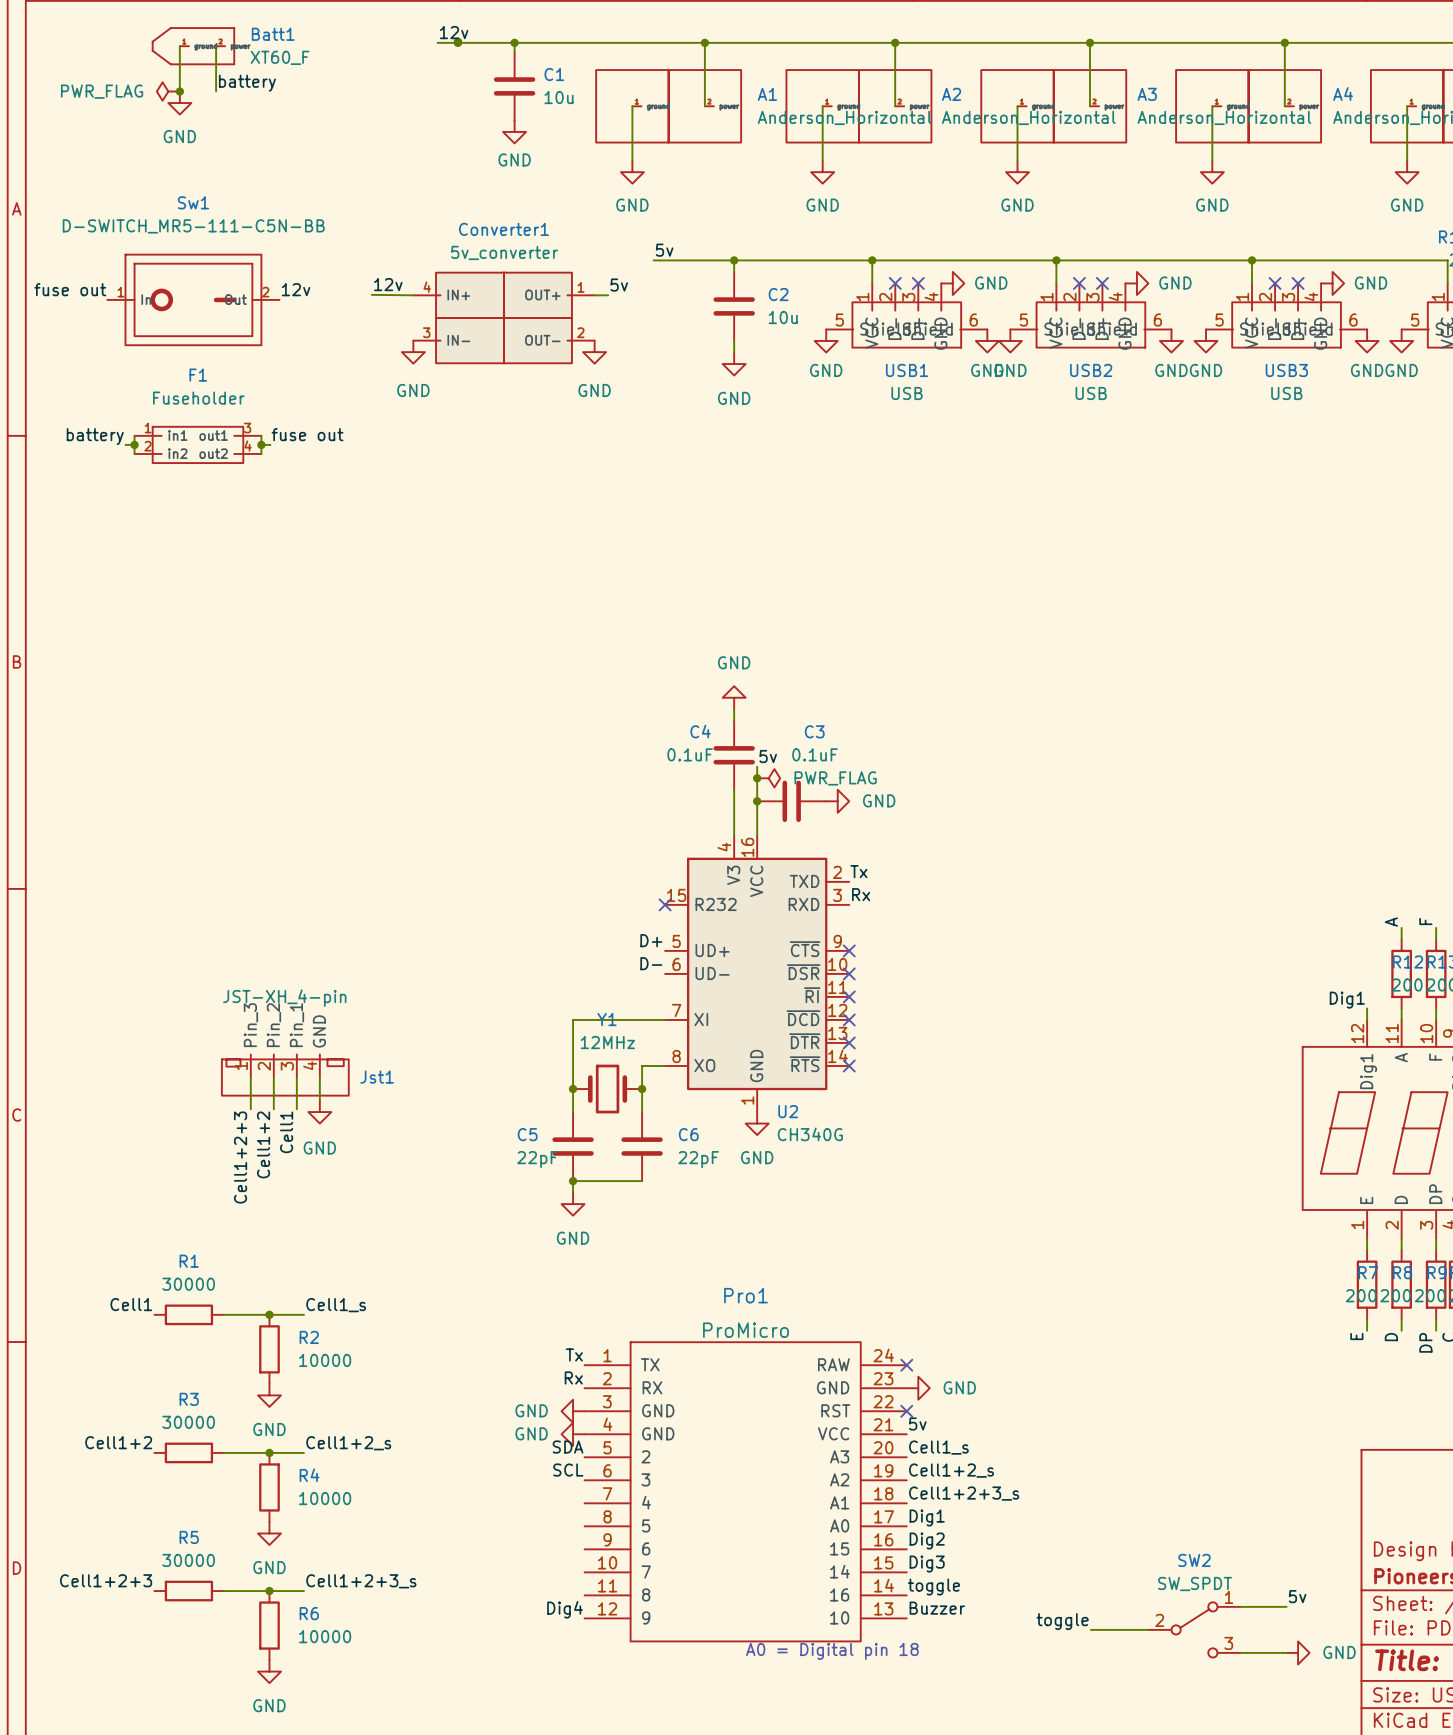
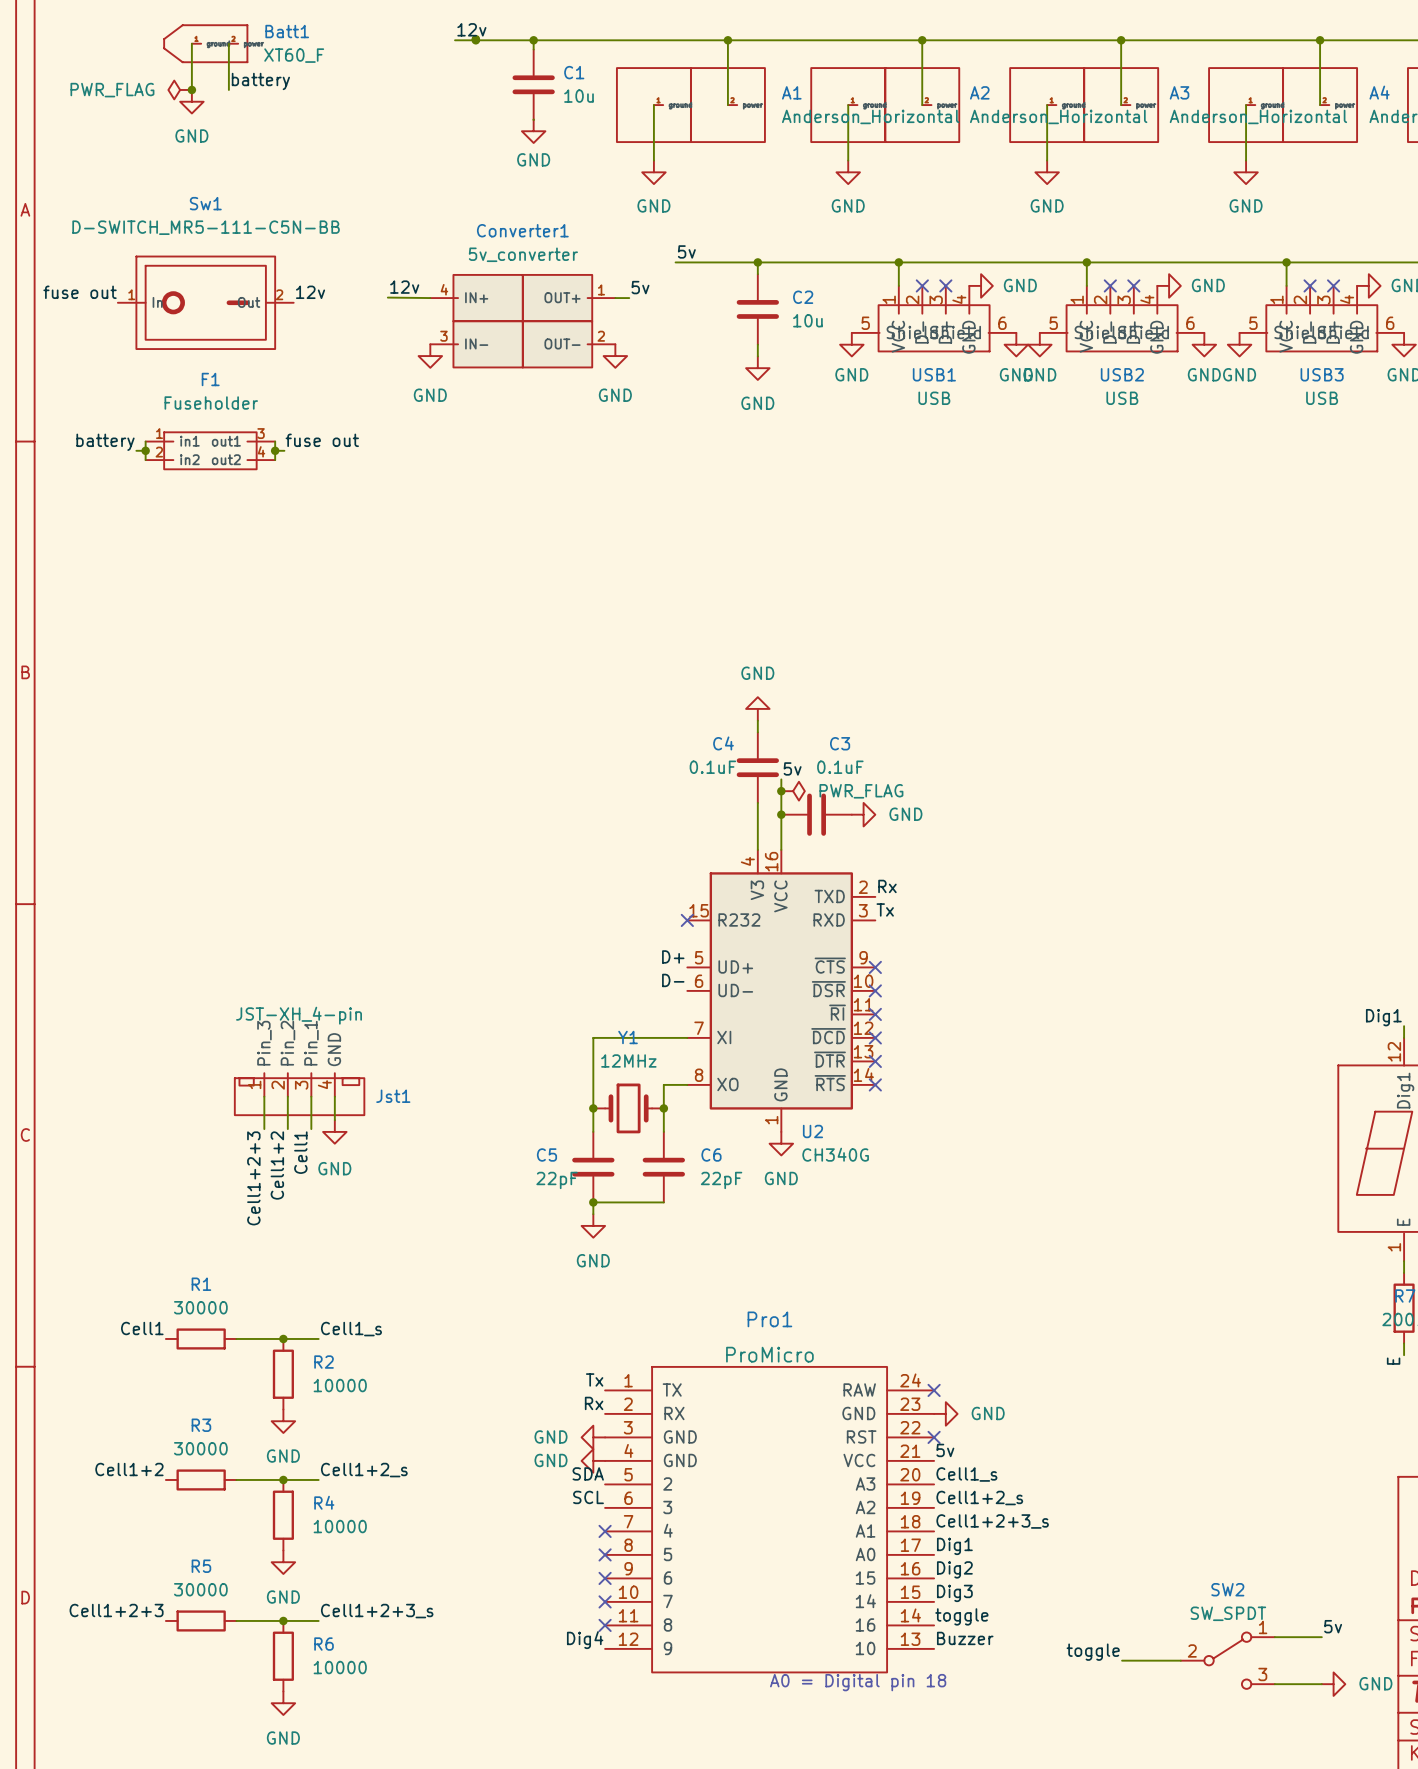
label: Tx (858, 871) -> Rx (887, 886)
label: Rx (861, 894) -> Tx (885, 909)
no-connect mark: none -> (605, 1531)
no-connect mark: none -> (605, 1554)
no-connect mark: none -> (605, 1578)
no-connect mark: none -> (605, 1601)
no-connect mark: none -> (605, 1625)

